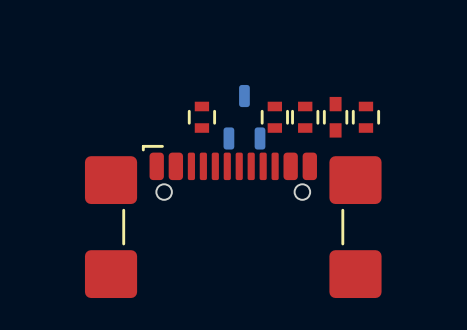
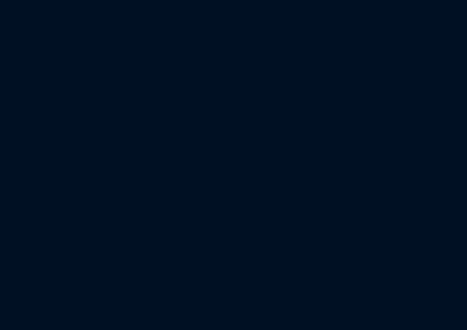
part: (201, 117) -> none
part: (244, 117) -> none
part: (274, 117) -> none
part: (305, 117) -> none
part: (335, 117) -> none
part: (365, 117) -> none
part: (233, 221) -> none

